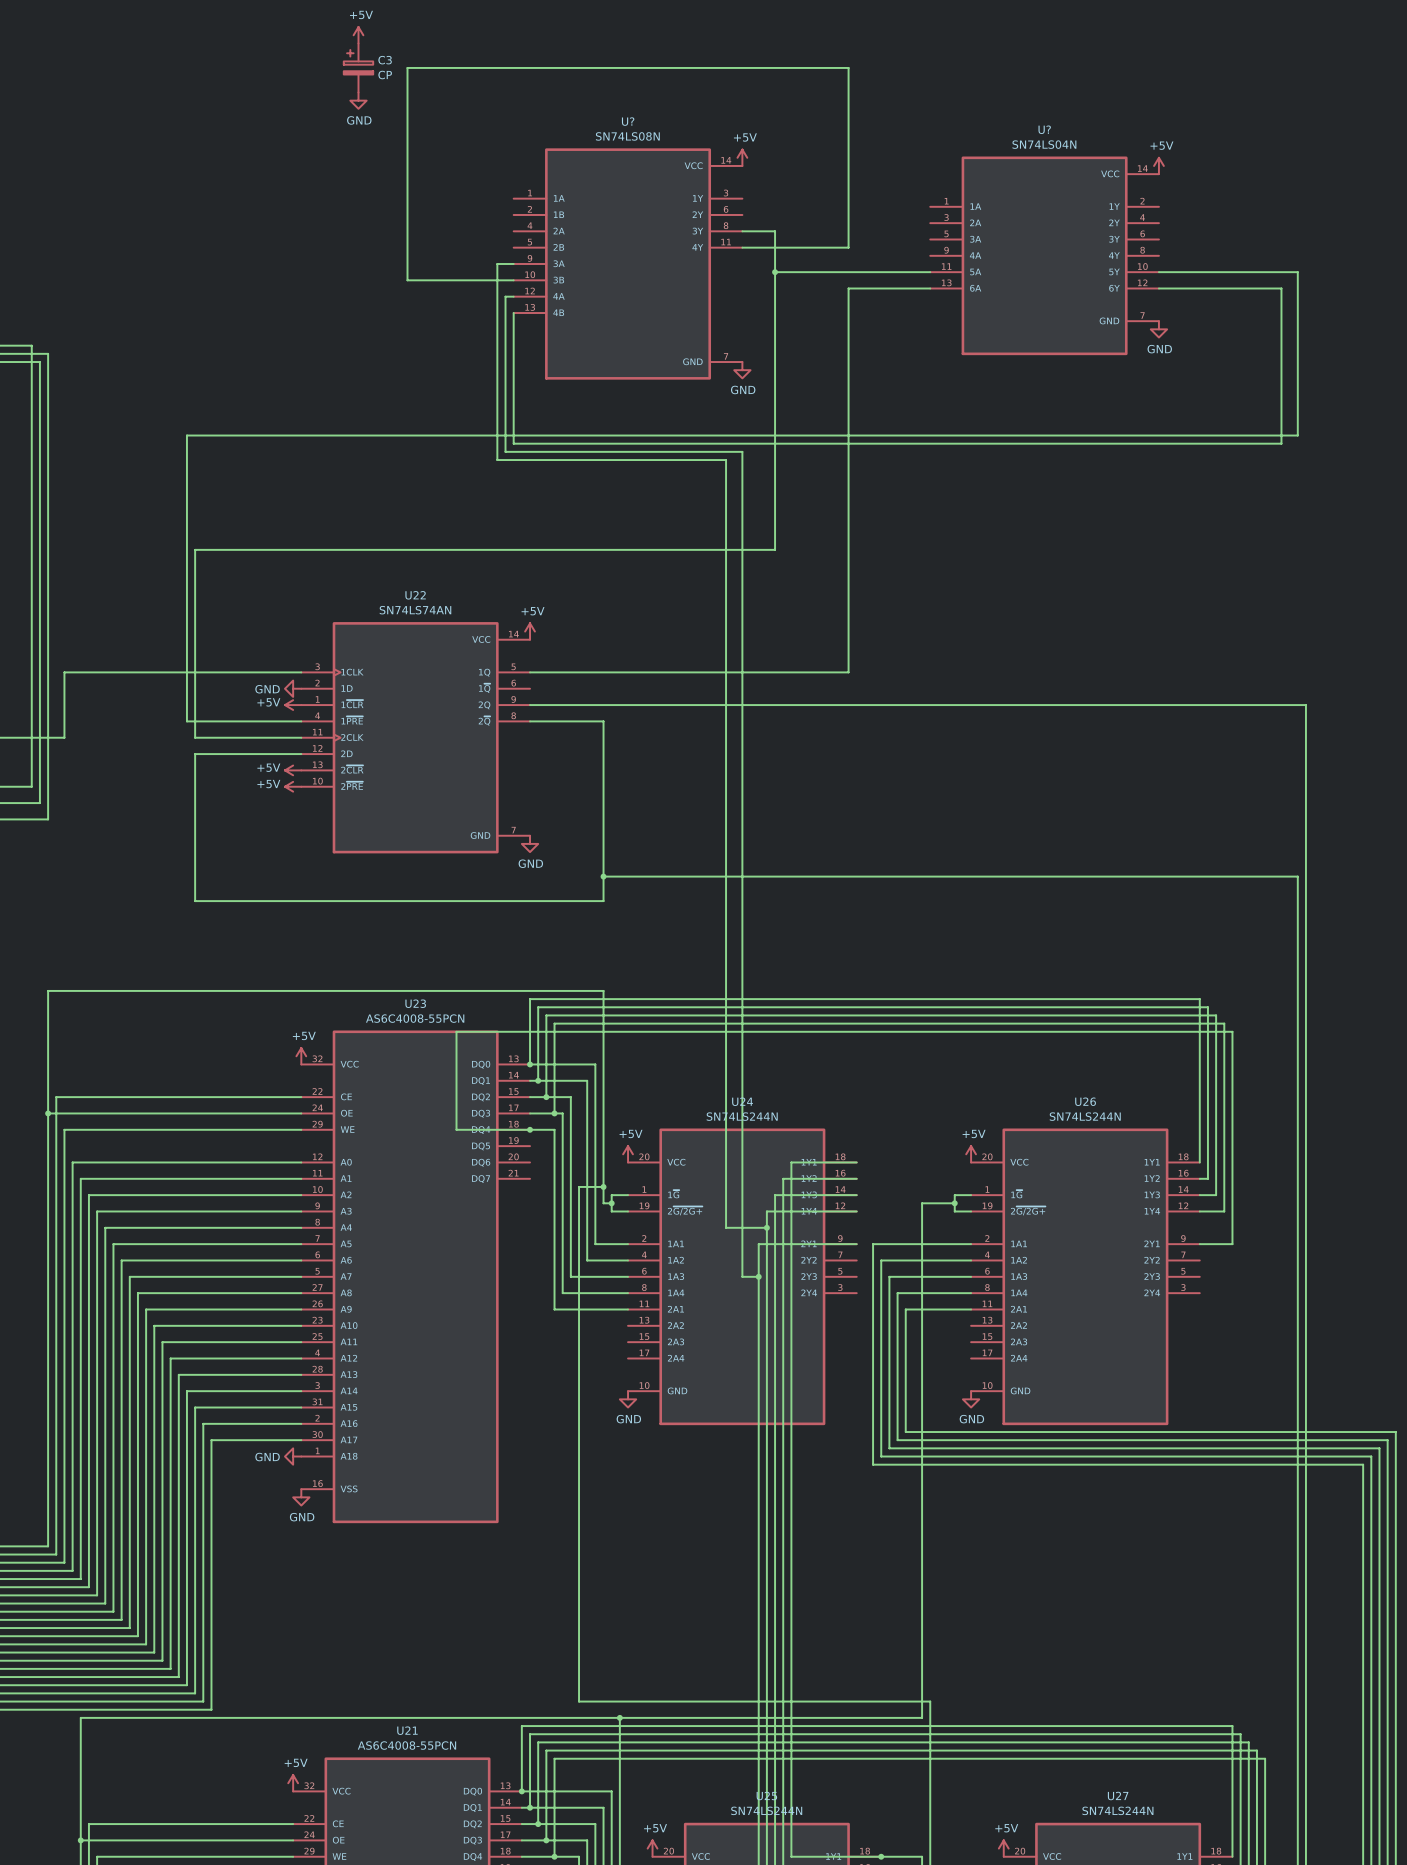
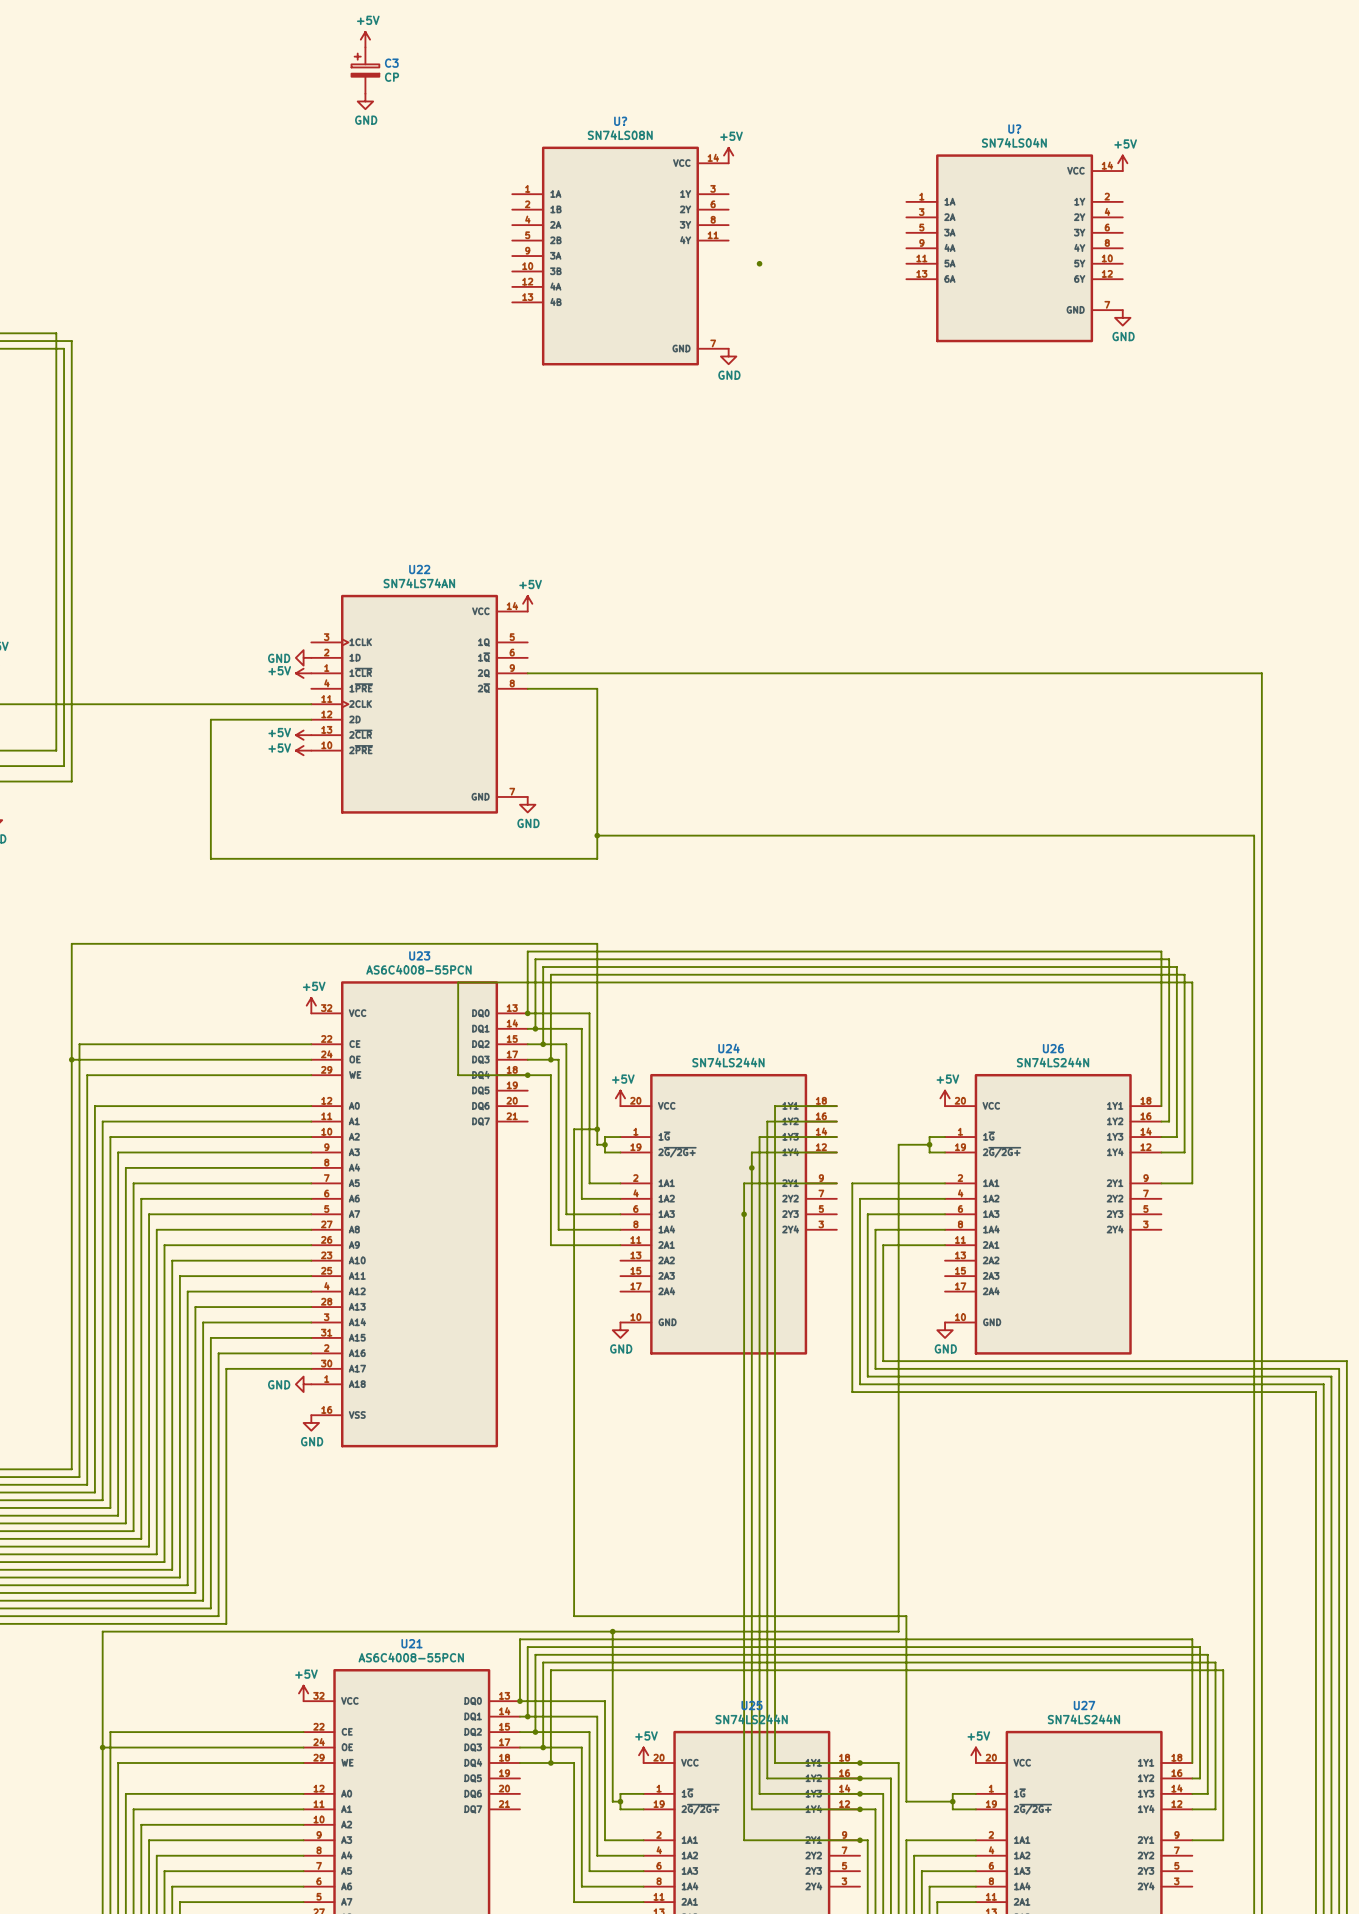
wire: (742, 231) (775, 231) (775, 549) (195, 549) (195, 737) -> none
wire: (742, 247) (848, 247) (848, 67) (407, 67) (407, 280) (513, 280) -> none
wire: (513, 263) (497, 263) (497, 460) (726, 460) (726, 1227) (766, 1227) -> none
wire: (775, 272) (930, 272) -> none
wire: (1158, 272) (1297, 272) (1297, 435) (186, 435) (186, 721) (301, 721) -> none
wire: (930, 288) (848, 288) (848, 672) (530, 672) -> none
wire: (1158, 288) (1281, 288) (1281, 443) (513, 443) (513, 313) -> none
wire: (513, 296) (505, 296) (505, 451) (742, 451) (742, 1276) (758, 1276) -> none
wire: (301, 672) (64, 672) (64, 737) -> (210, 704) (87, 704)

